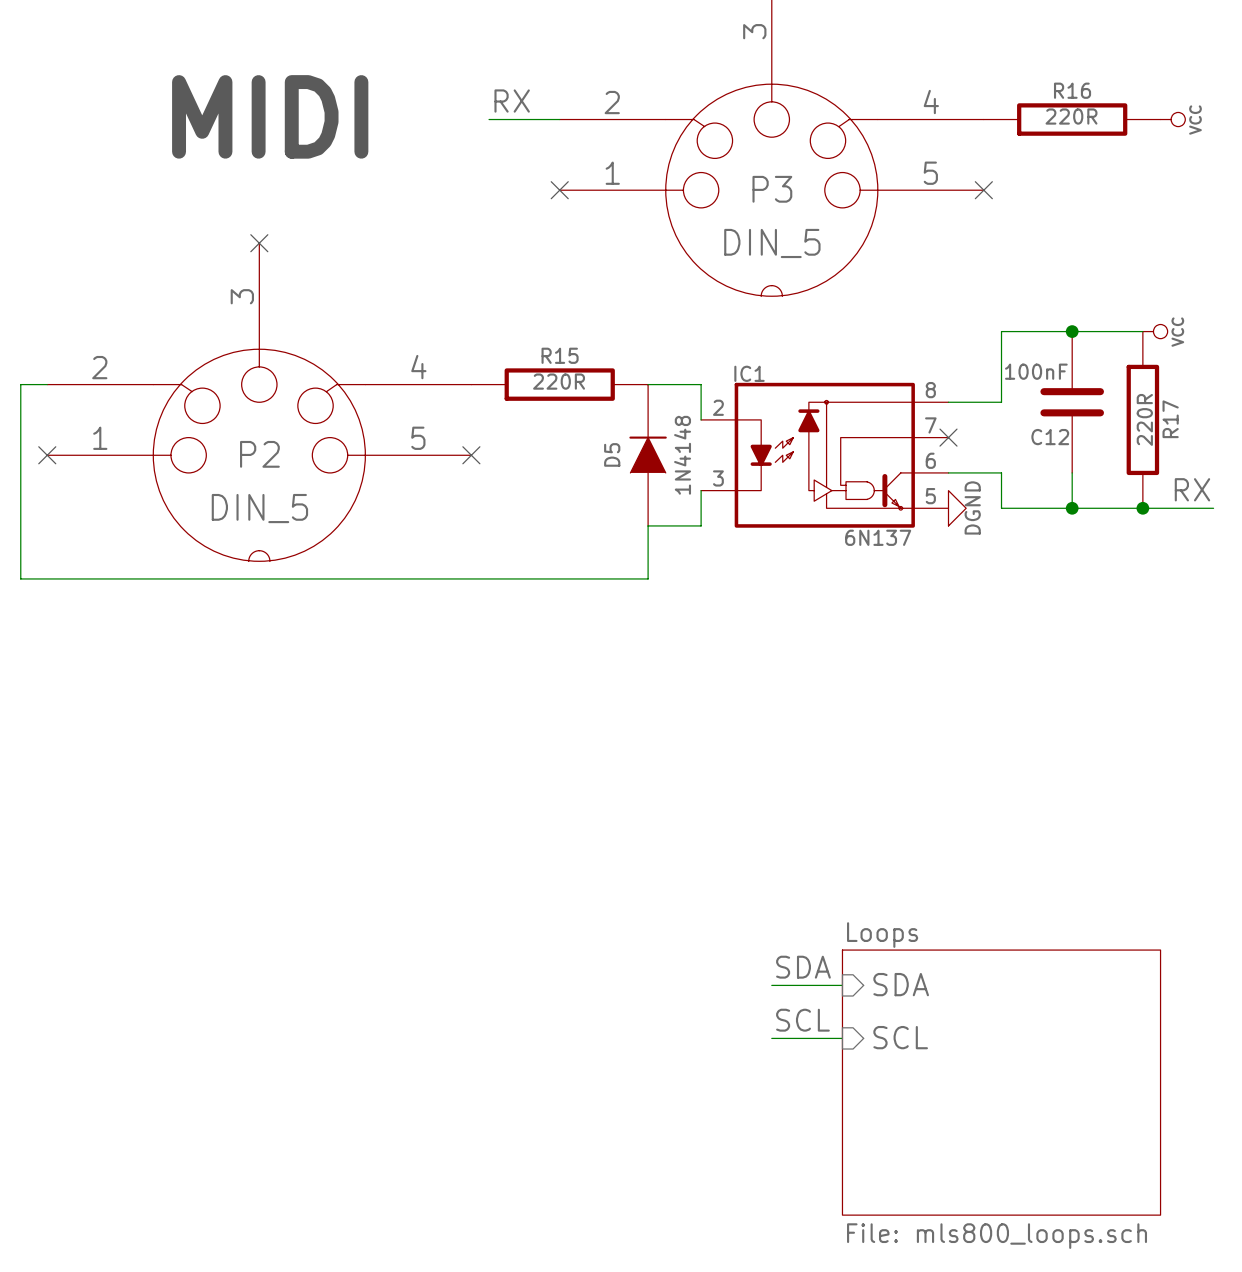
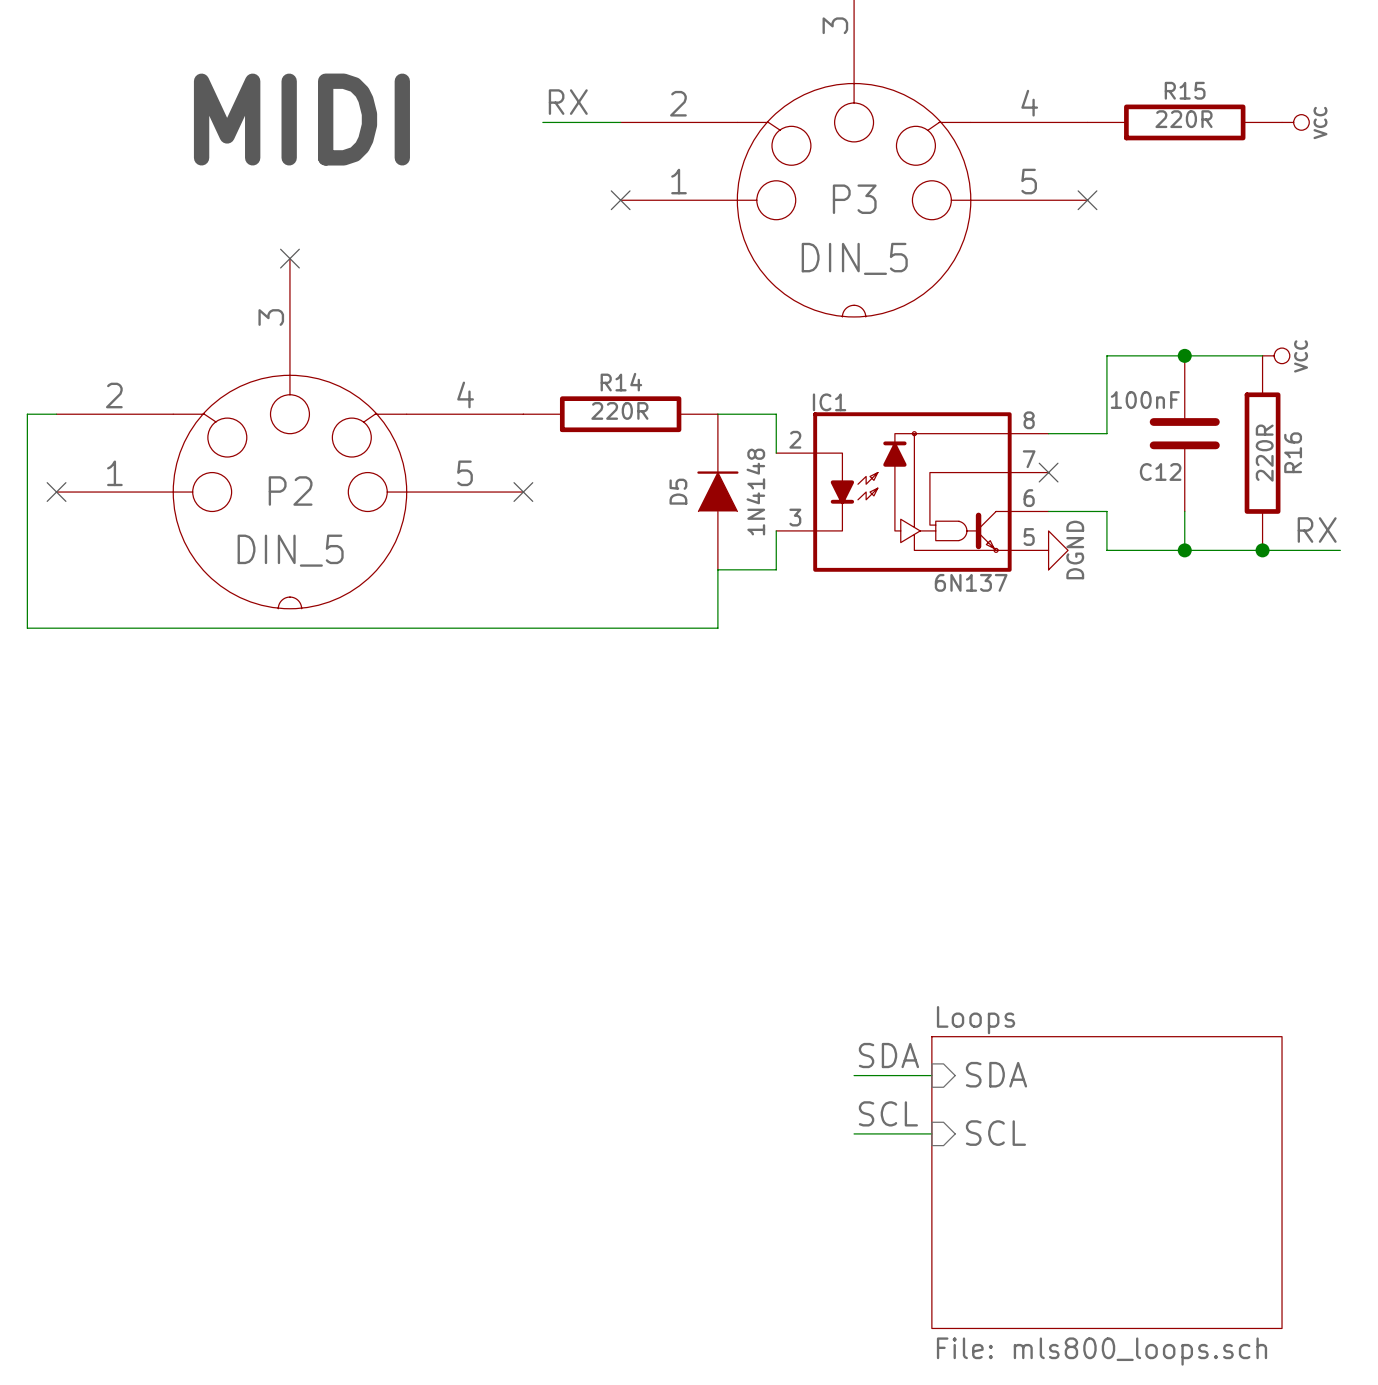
R16 name: R16 (1072, 90) -> R15 (1185, 90)
R15 name: R15 (560, 355) -> R14 (621, 382)
R17 name: R17 (1170, 419) -> R16 (1293, 452)

